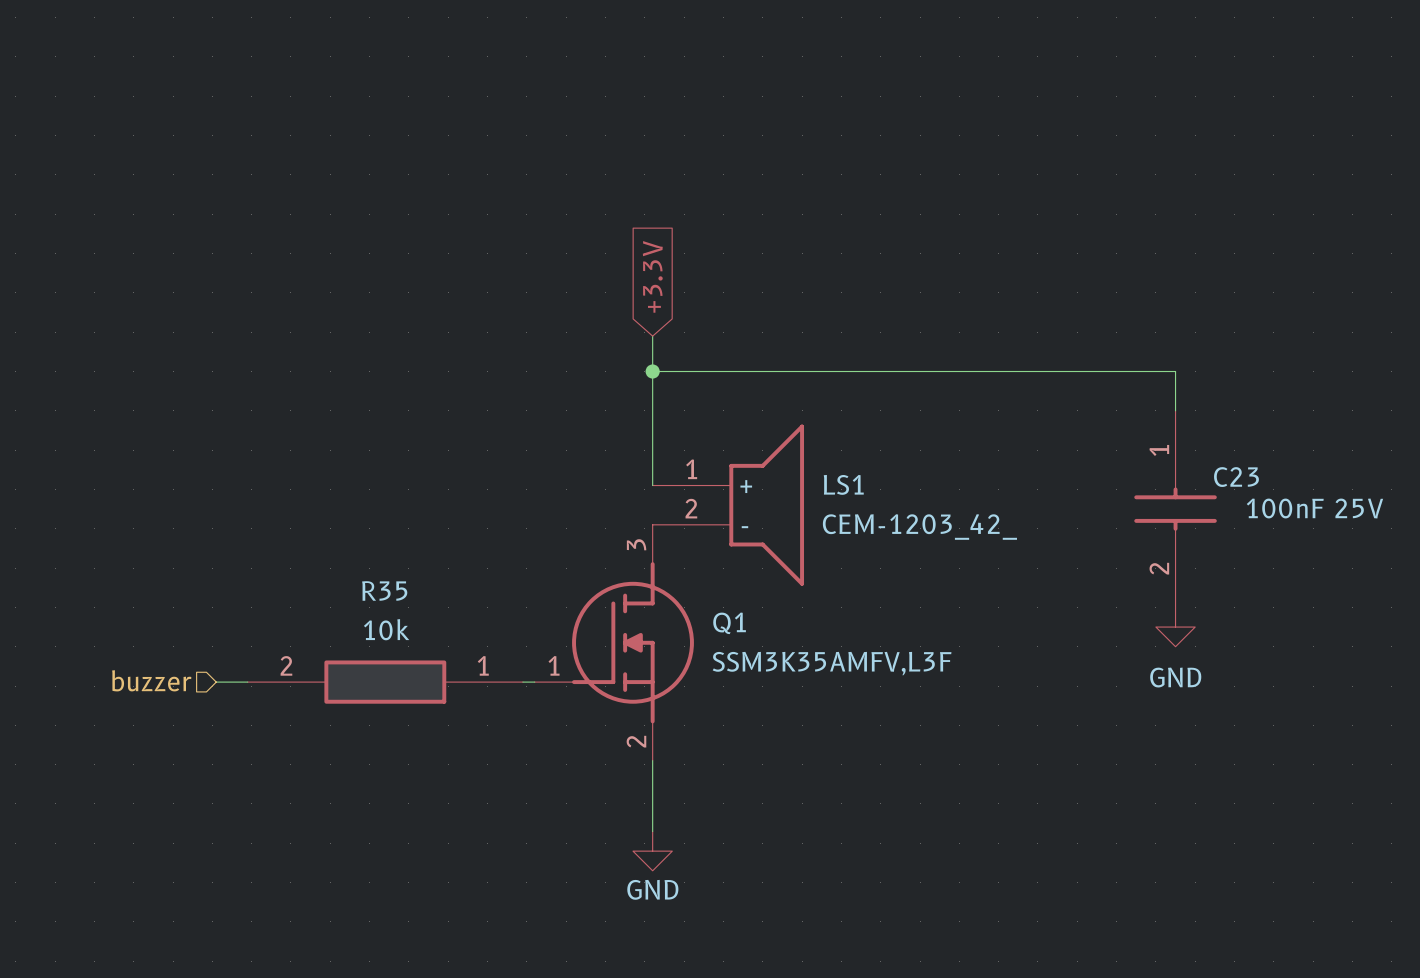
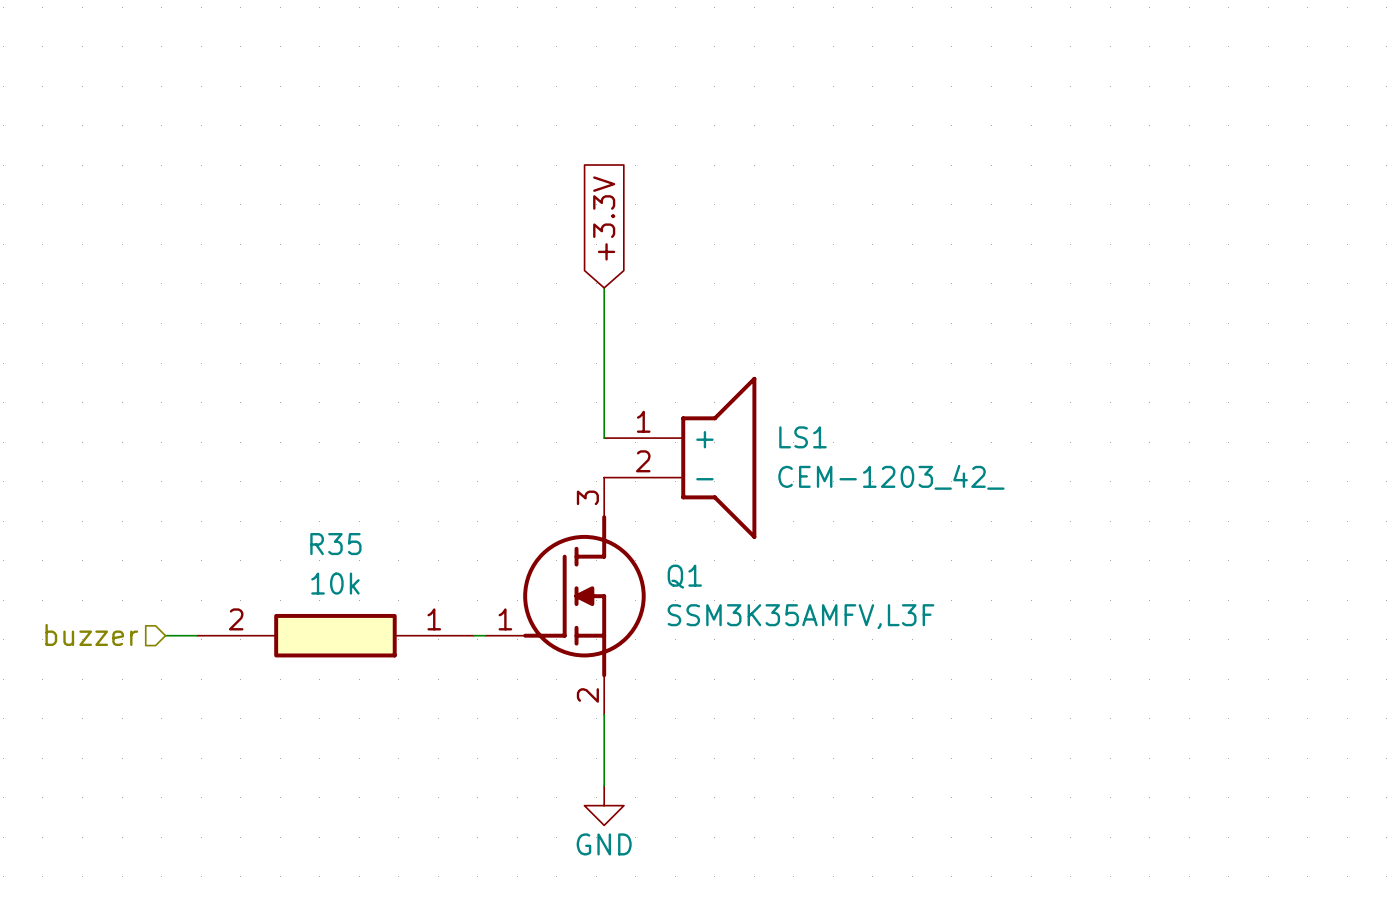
wire: (652, 371) (1175, 371) (1175, 410) -> none
junction: (652, 371) -> none
C23: 100nF 25V (1175, 509) -> none
power symbol: GND (1175, 627) -> none

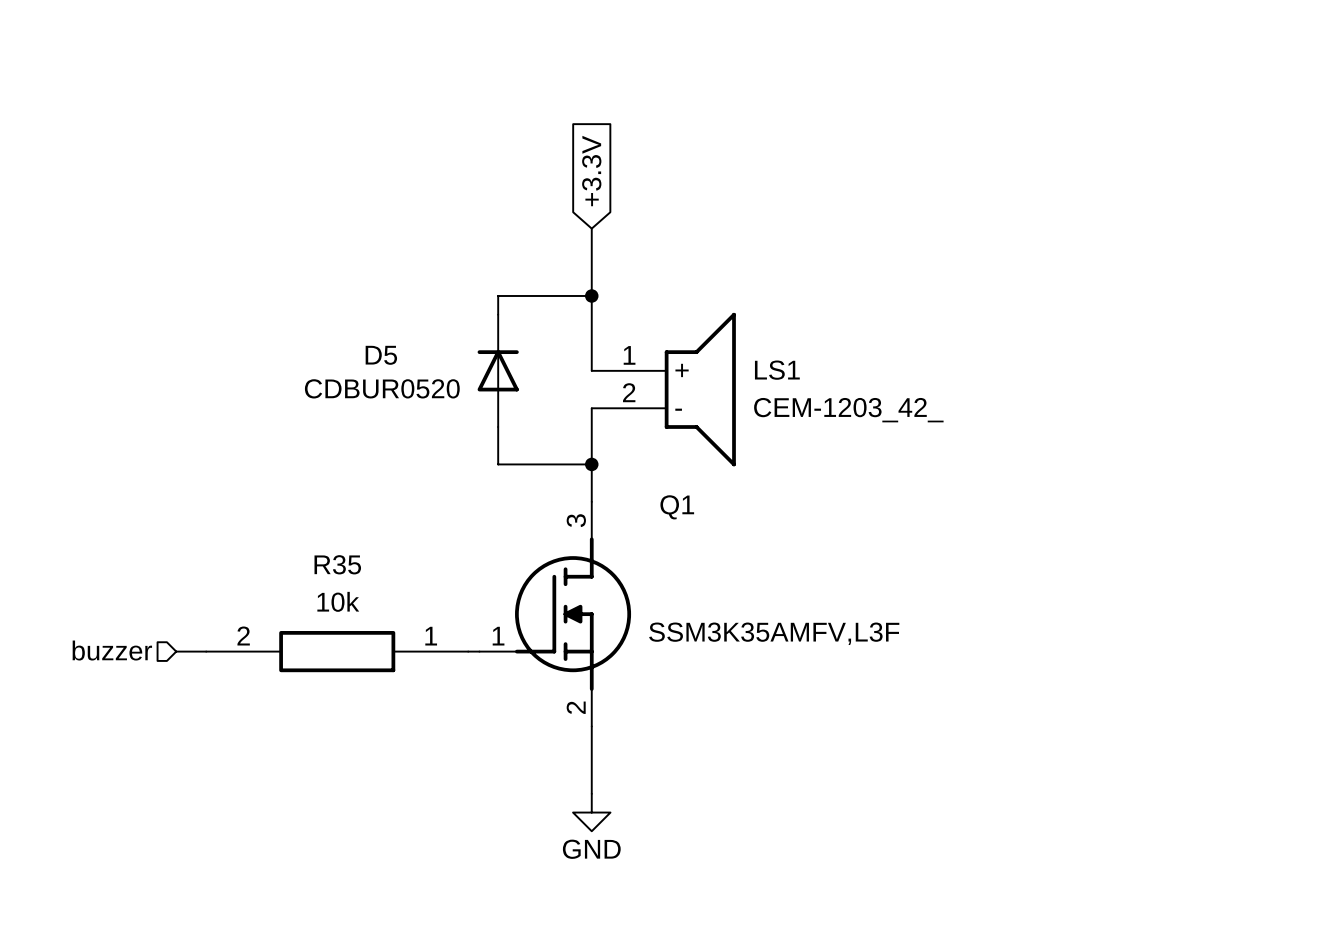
wire: none -> (591, 228) (591, 322)
global label position: +3.3V (604, 218) -> +3.3V (591, 171)
wire: none -> (591, 295) (498, 295) (498, 314)
junction: none -> (591, 295)
D5: none -> CDBUR0520 (498, 370)
wire: (604, 339) (604, 378) -> none
wire: none -> (498, 427) (498, 464) (591, 464) (591, 501)
junction: none -> (591, 464)
LS1 position: (680, 457) -> (663, 389)
Q1 name position: Q1 (684, 576) -> Q1 (677, 507)

